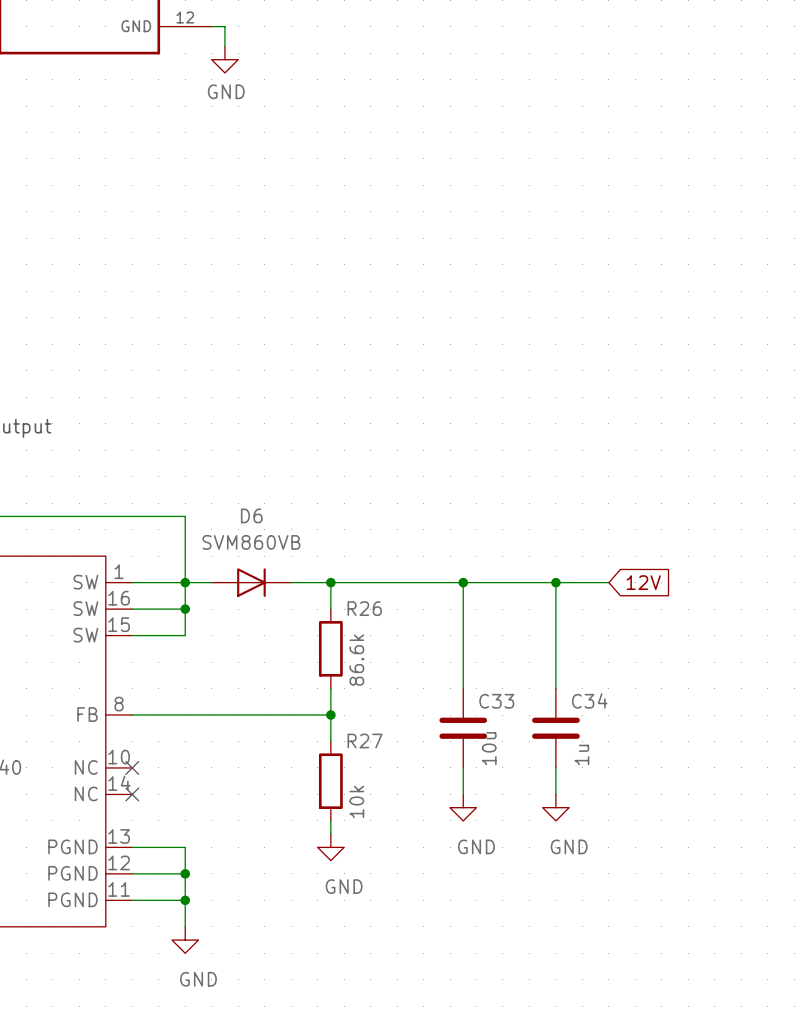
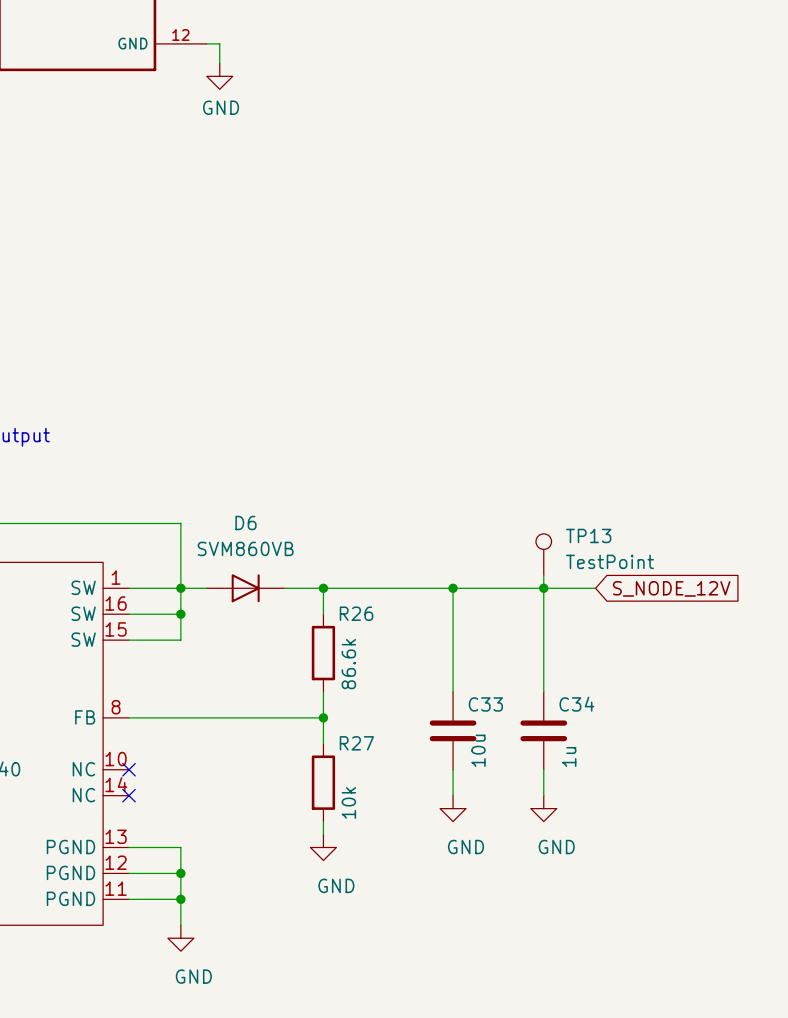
TP13: none -> TestPoint (543, 554)
wire: none -> (543, 575) (543, 588)
global label: 12V (643, 582) -> S_NODE_12V (671, 588)

